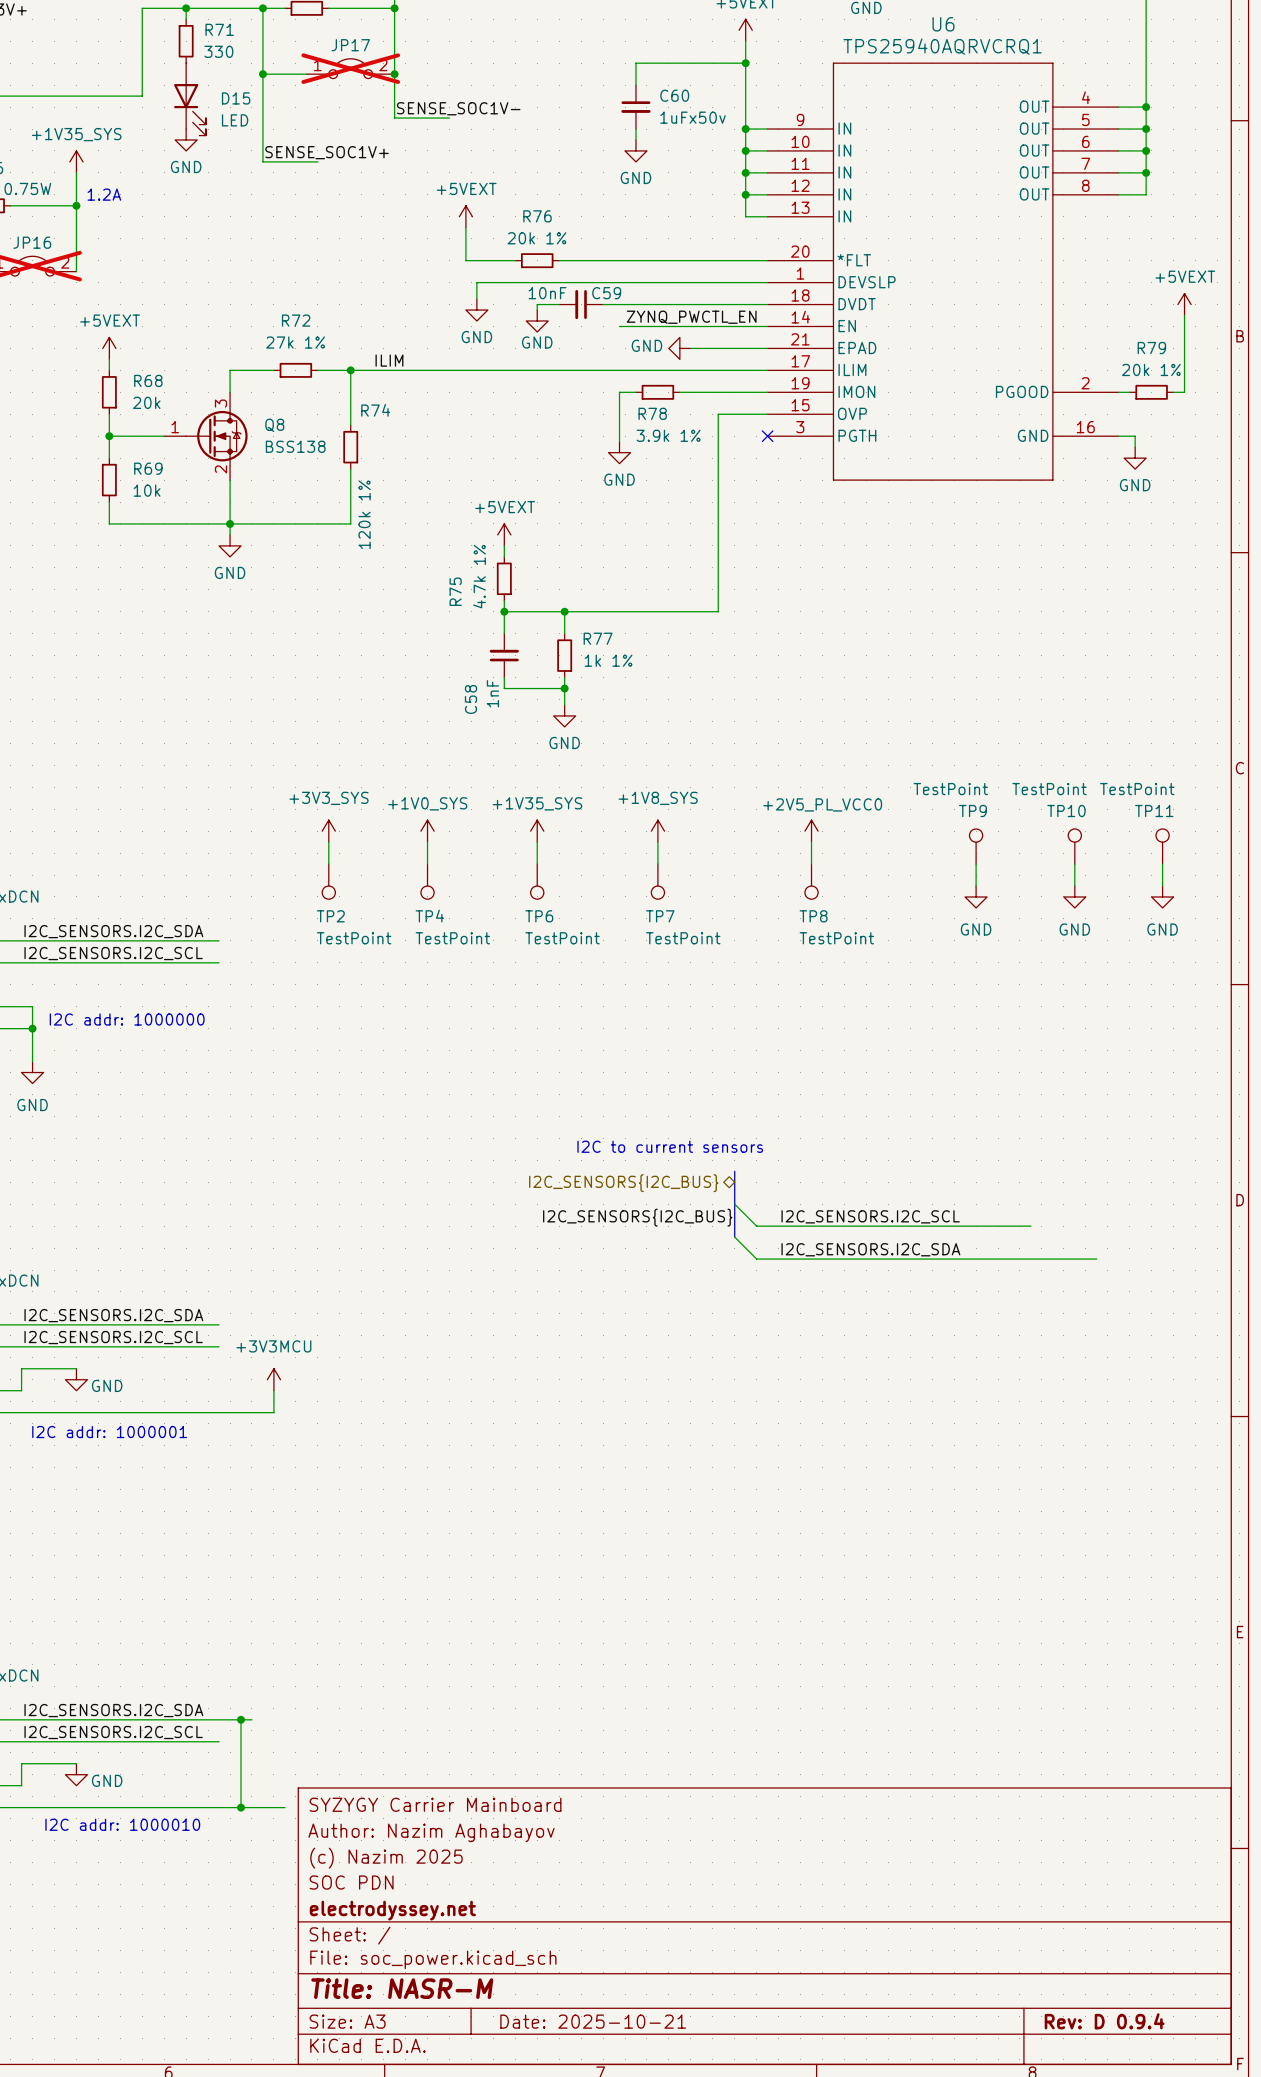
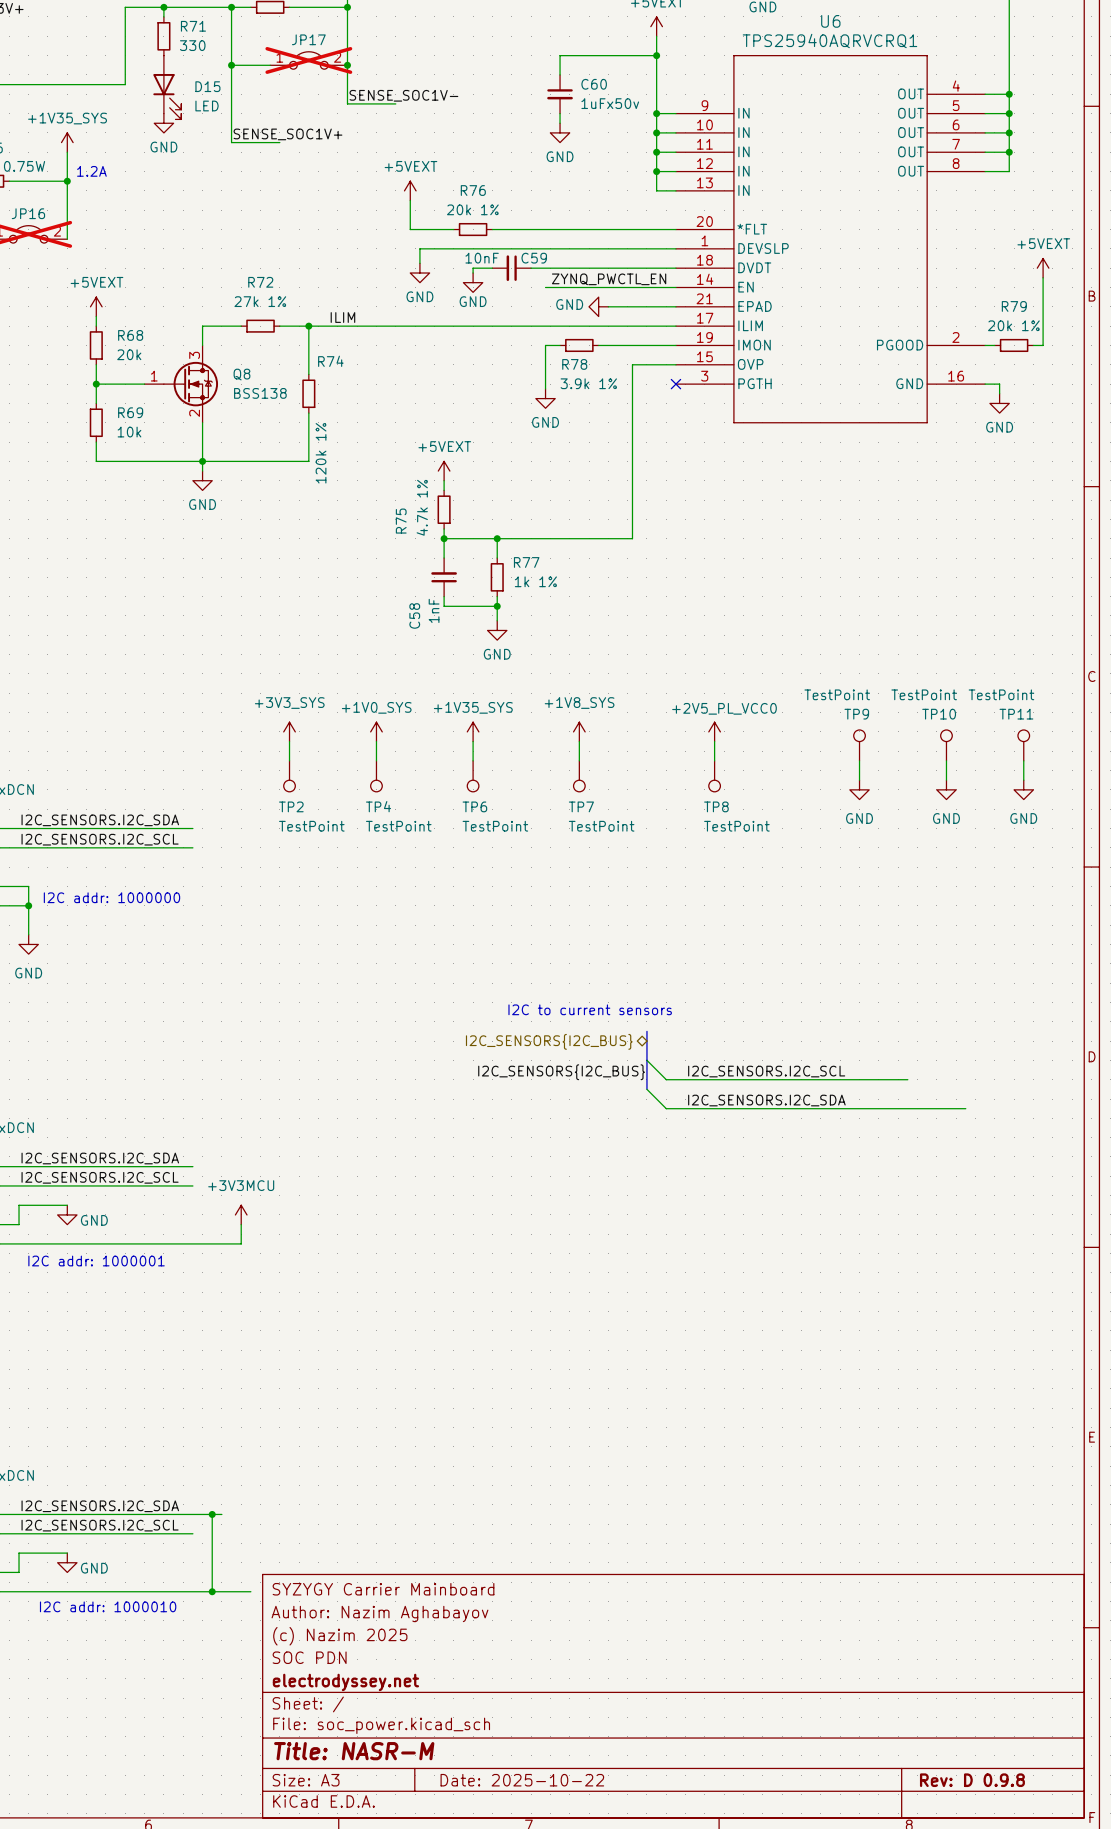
title block: Date: 2025-10-21 (593, 2021) -> Date: 2025-10-22 (522, 1780)
title block: Rev: D 0.9.4 (1104, 2021) -> Rev: D 0.9.8 (972, 1780)

